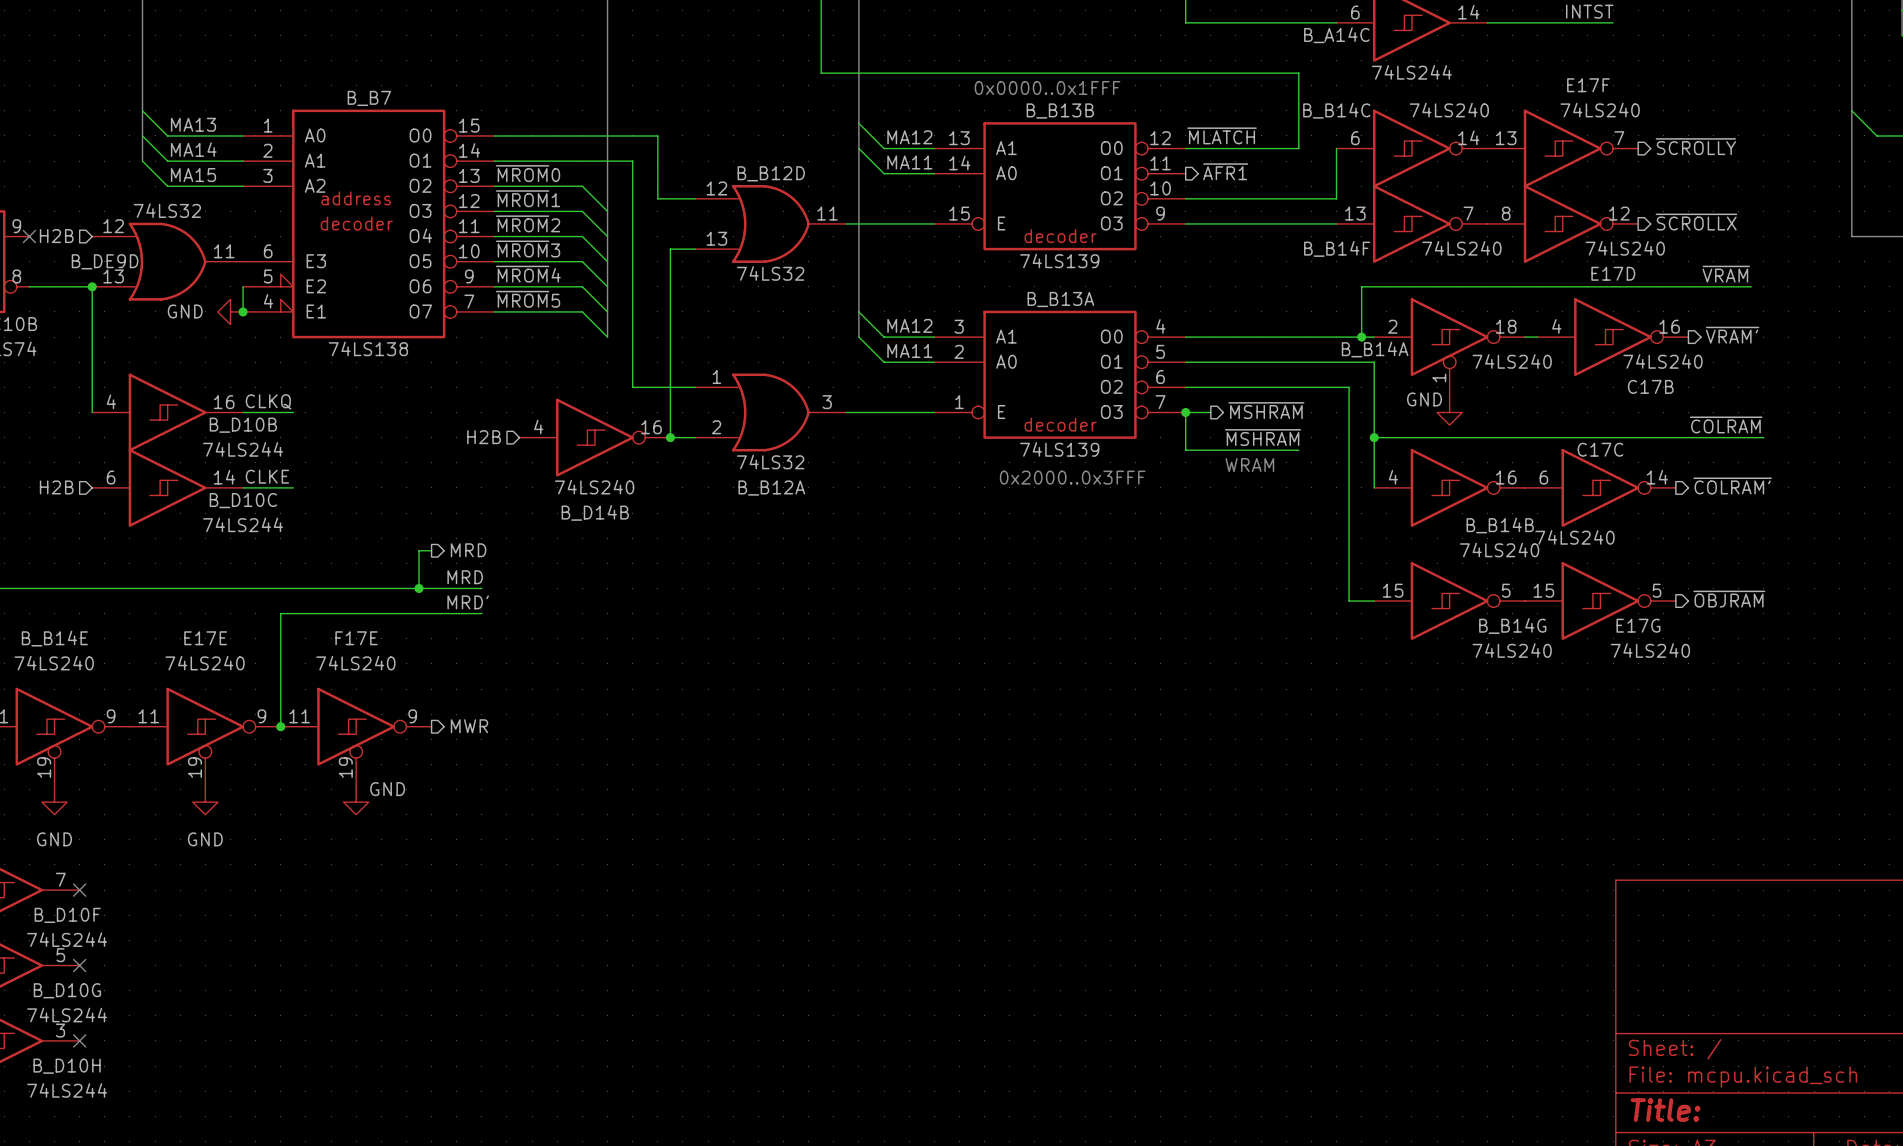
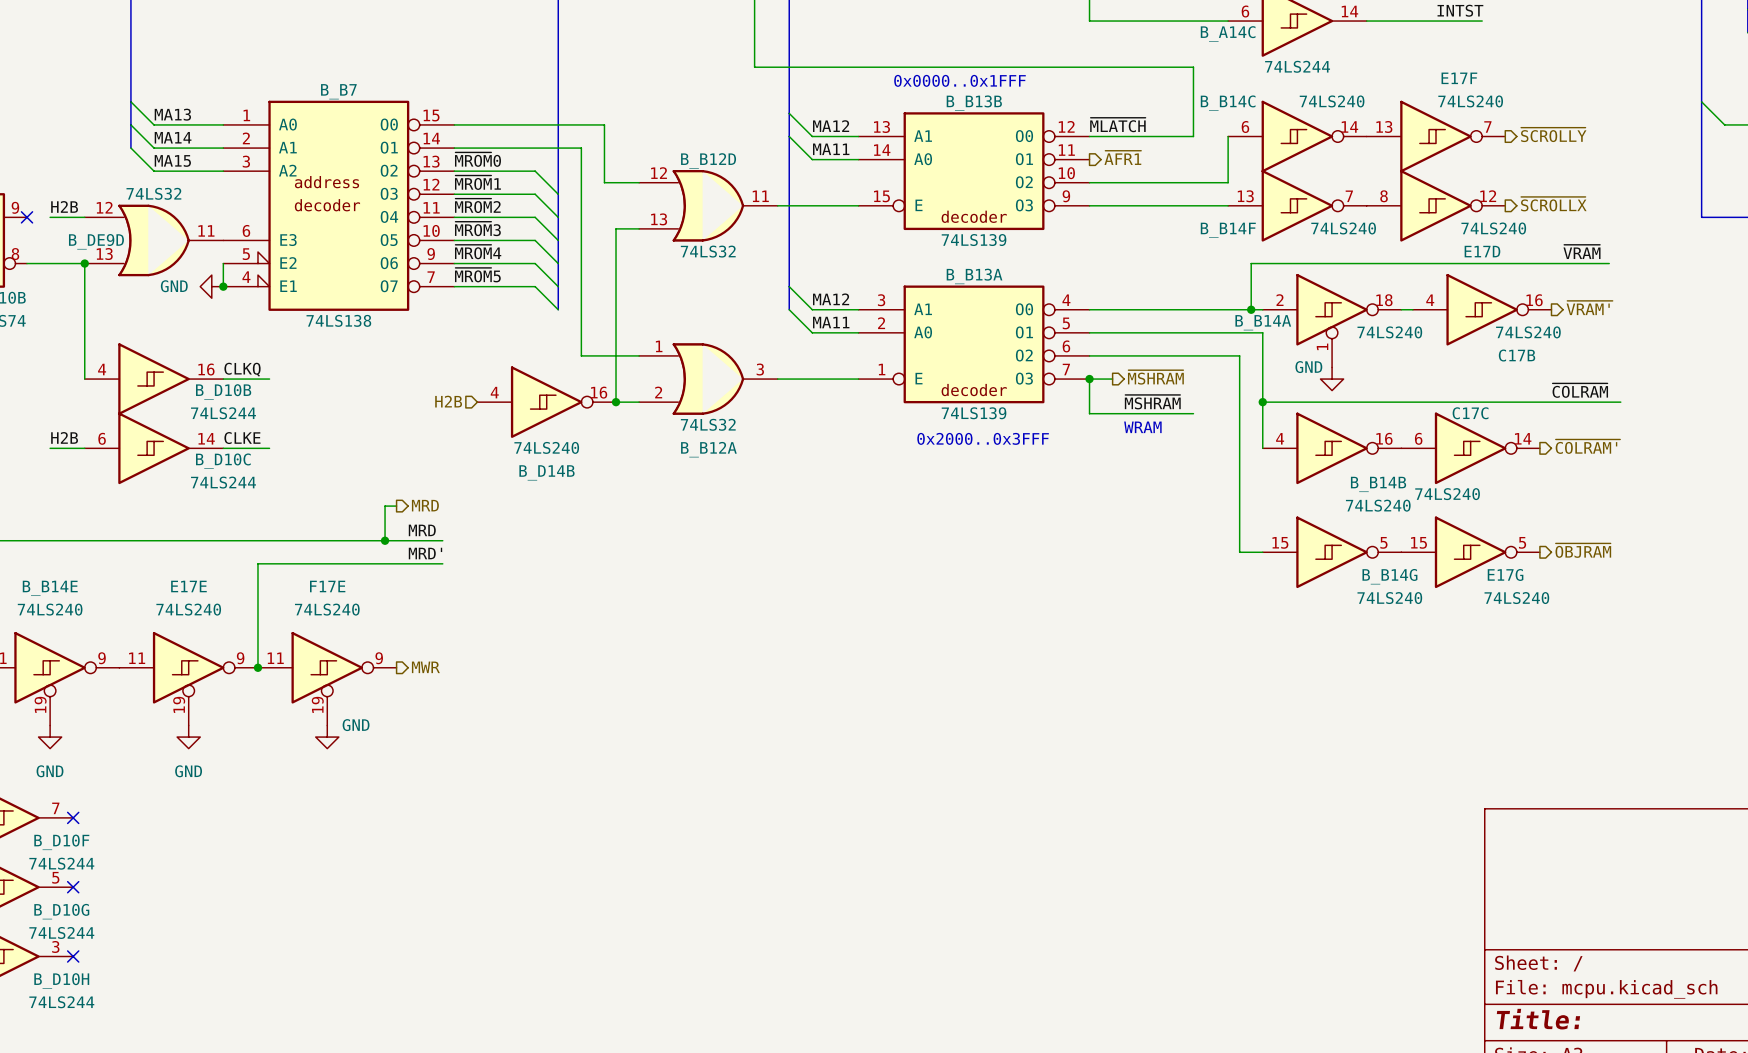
label: none -> H2B (64, 206)
wire: none -> (50, 217) (84, 217)
hierarchical label: H2B (56, 236) -> none
label: none -> H2B (64, 437)
wire: none -> (50, 448) (84, 448)
hierarchical label: H2B (56, 487) -> none

